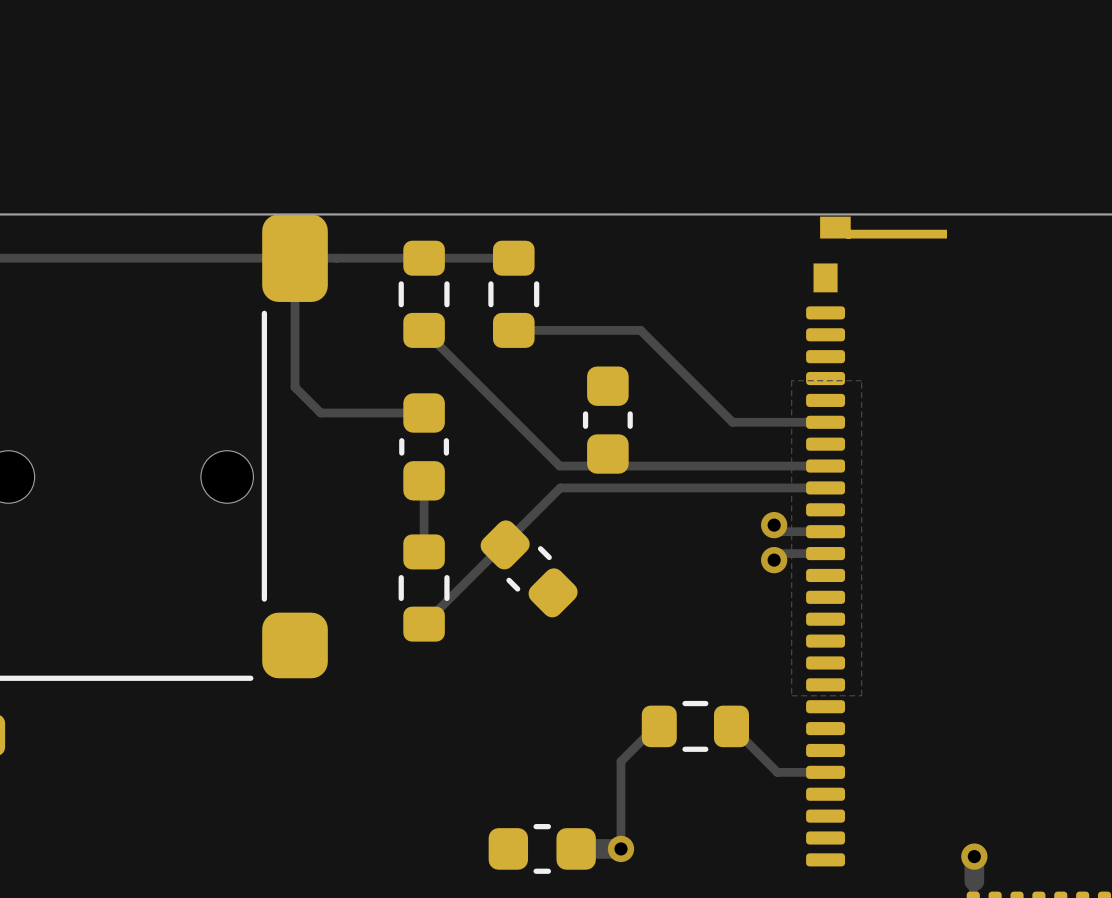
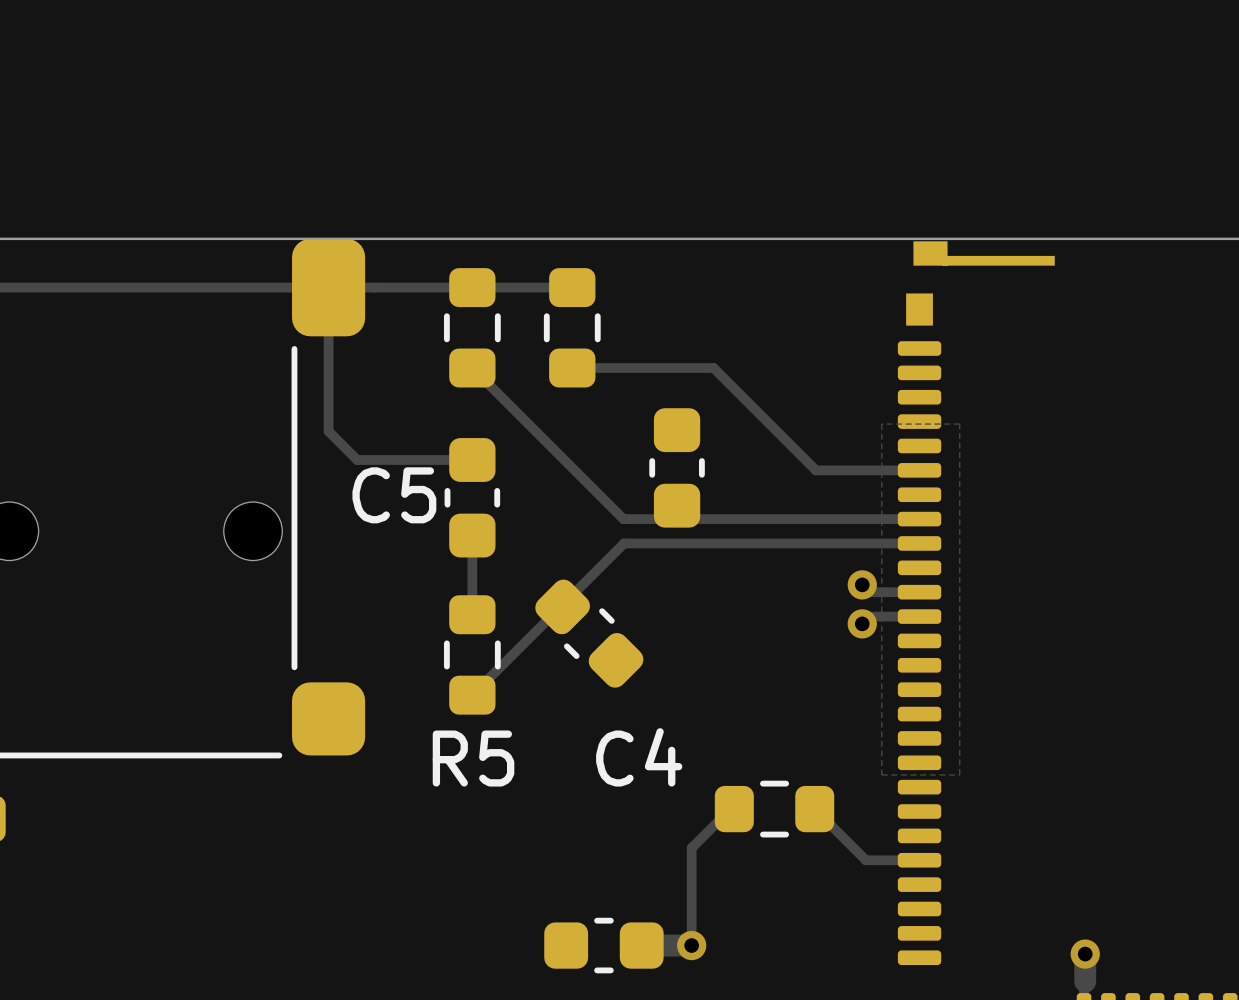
C5 name: none -> C5 (394, 495)
C4 name: none -> C4 (639, 757)
R5 name: none -> R5 (473, 758)

